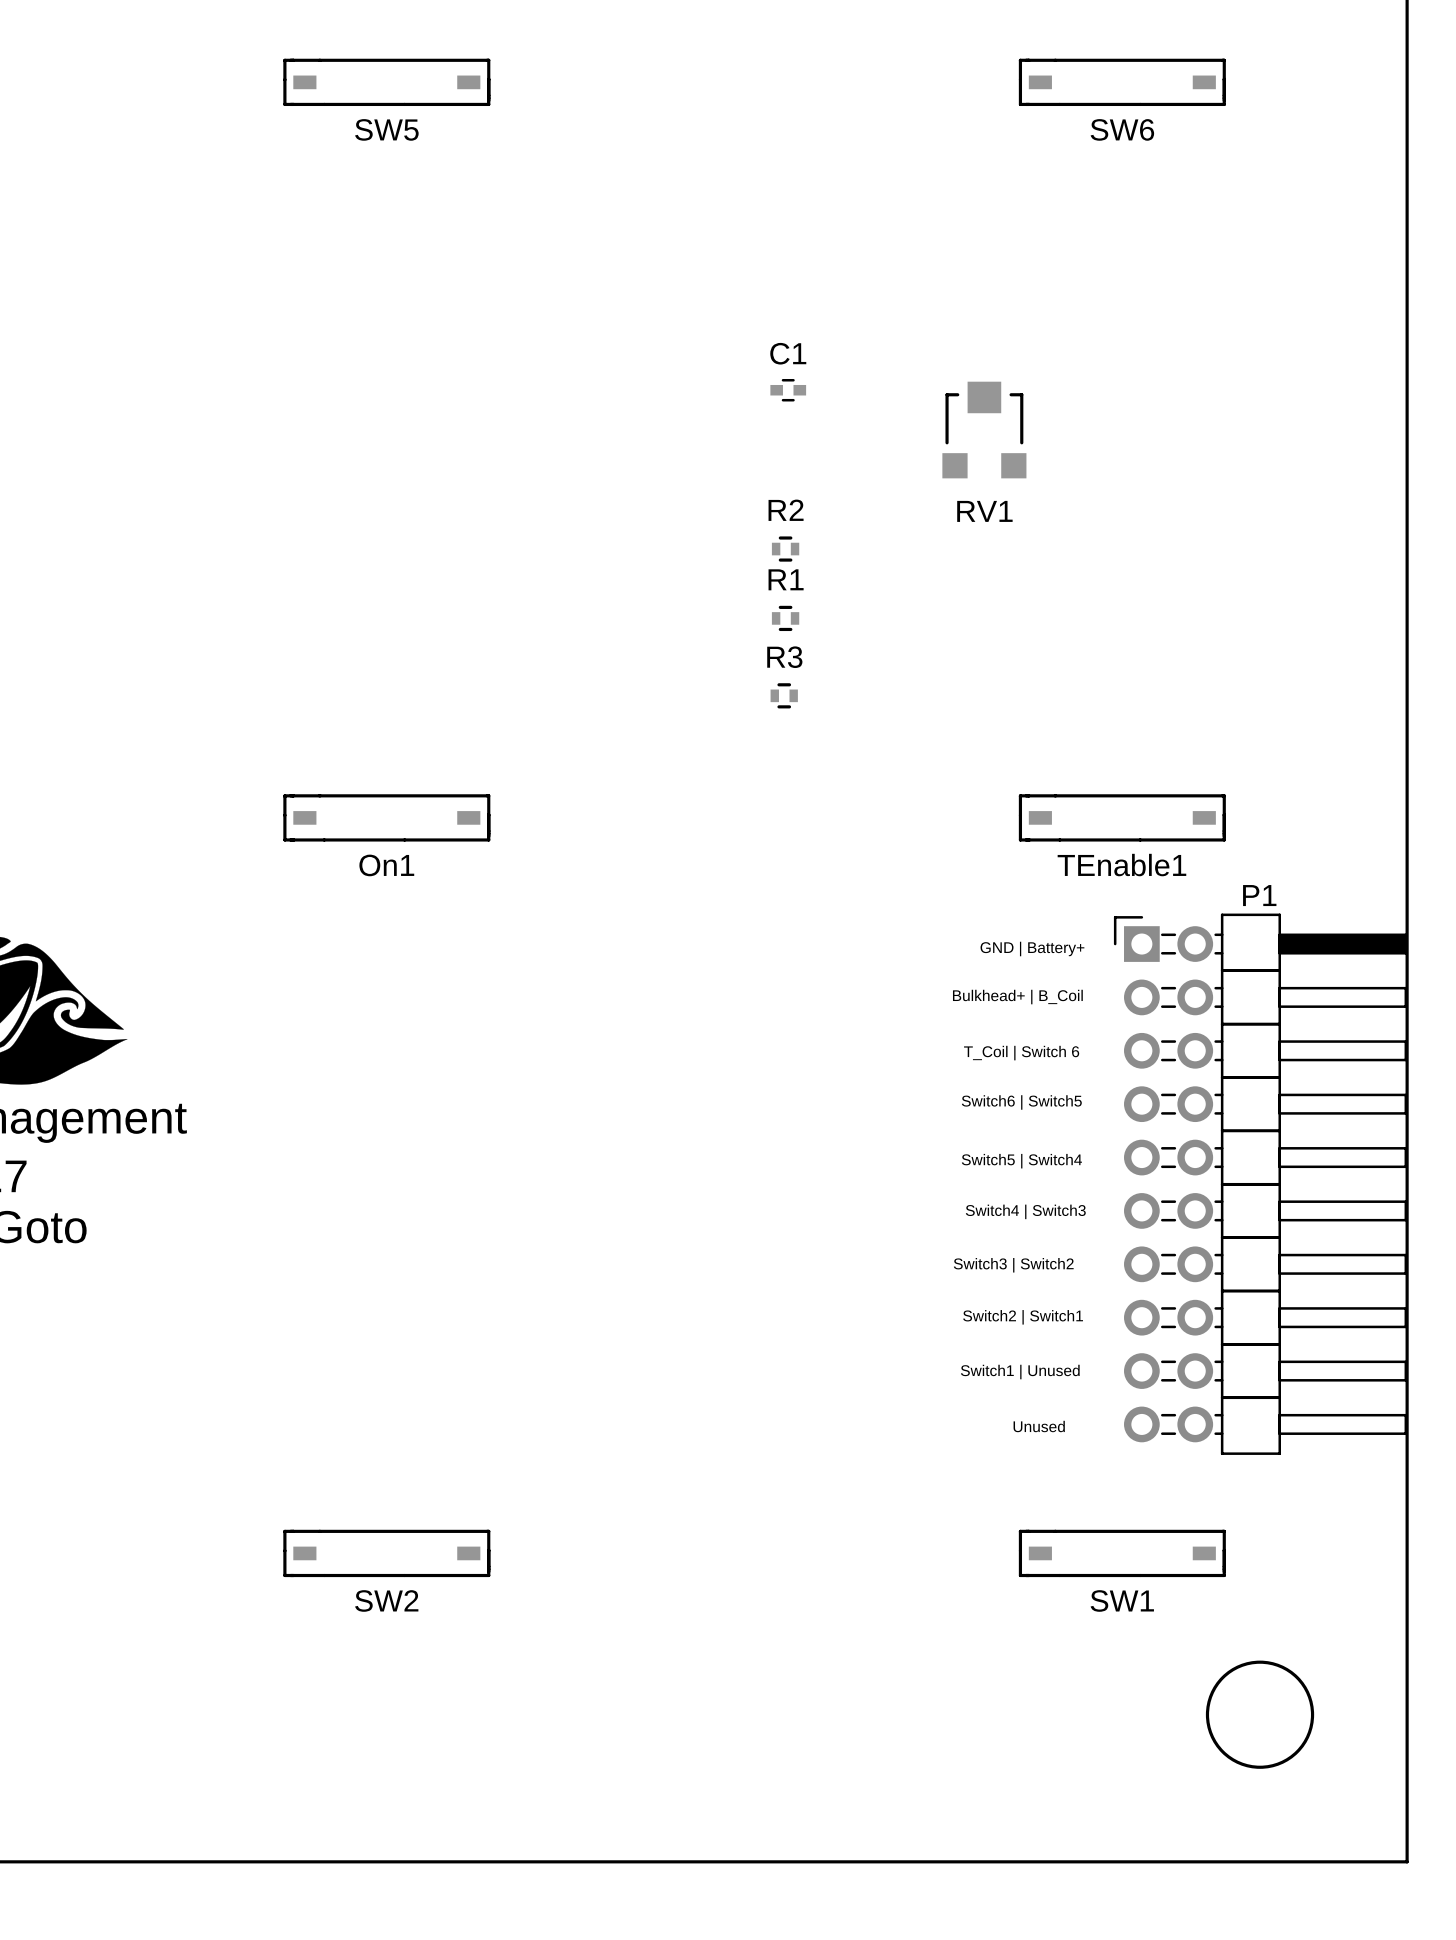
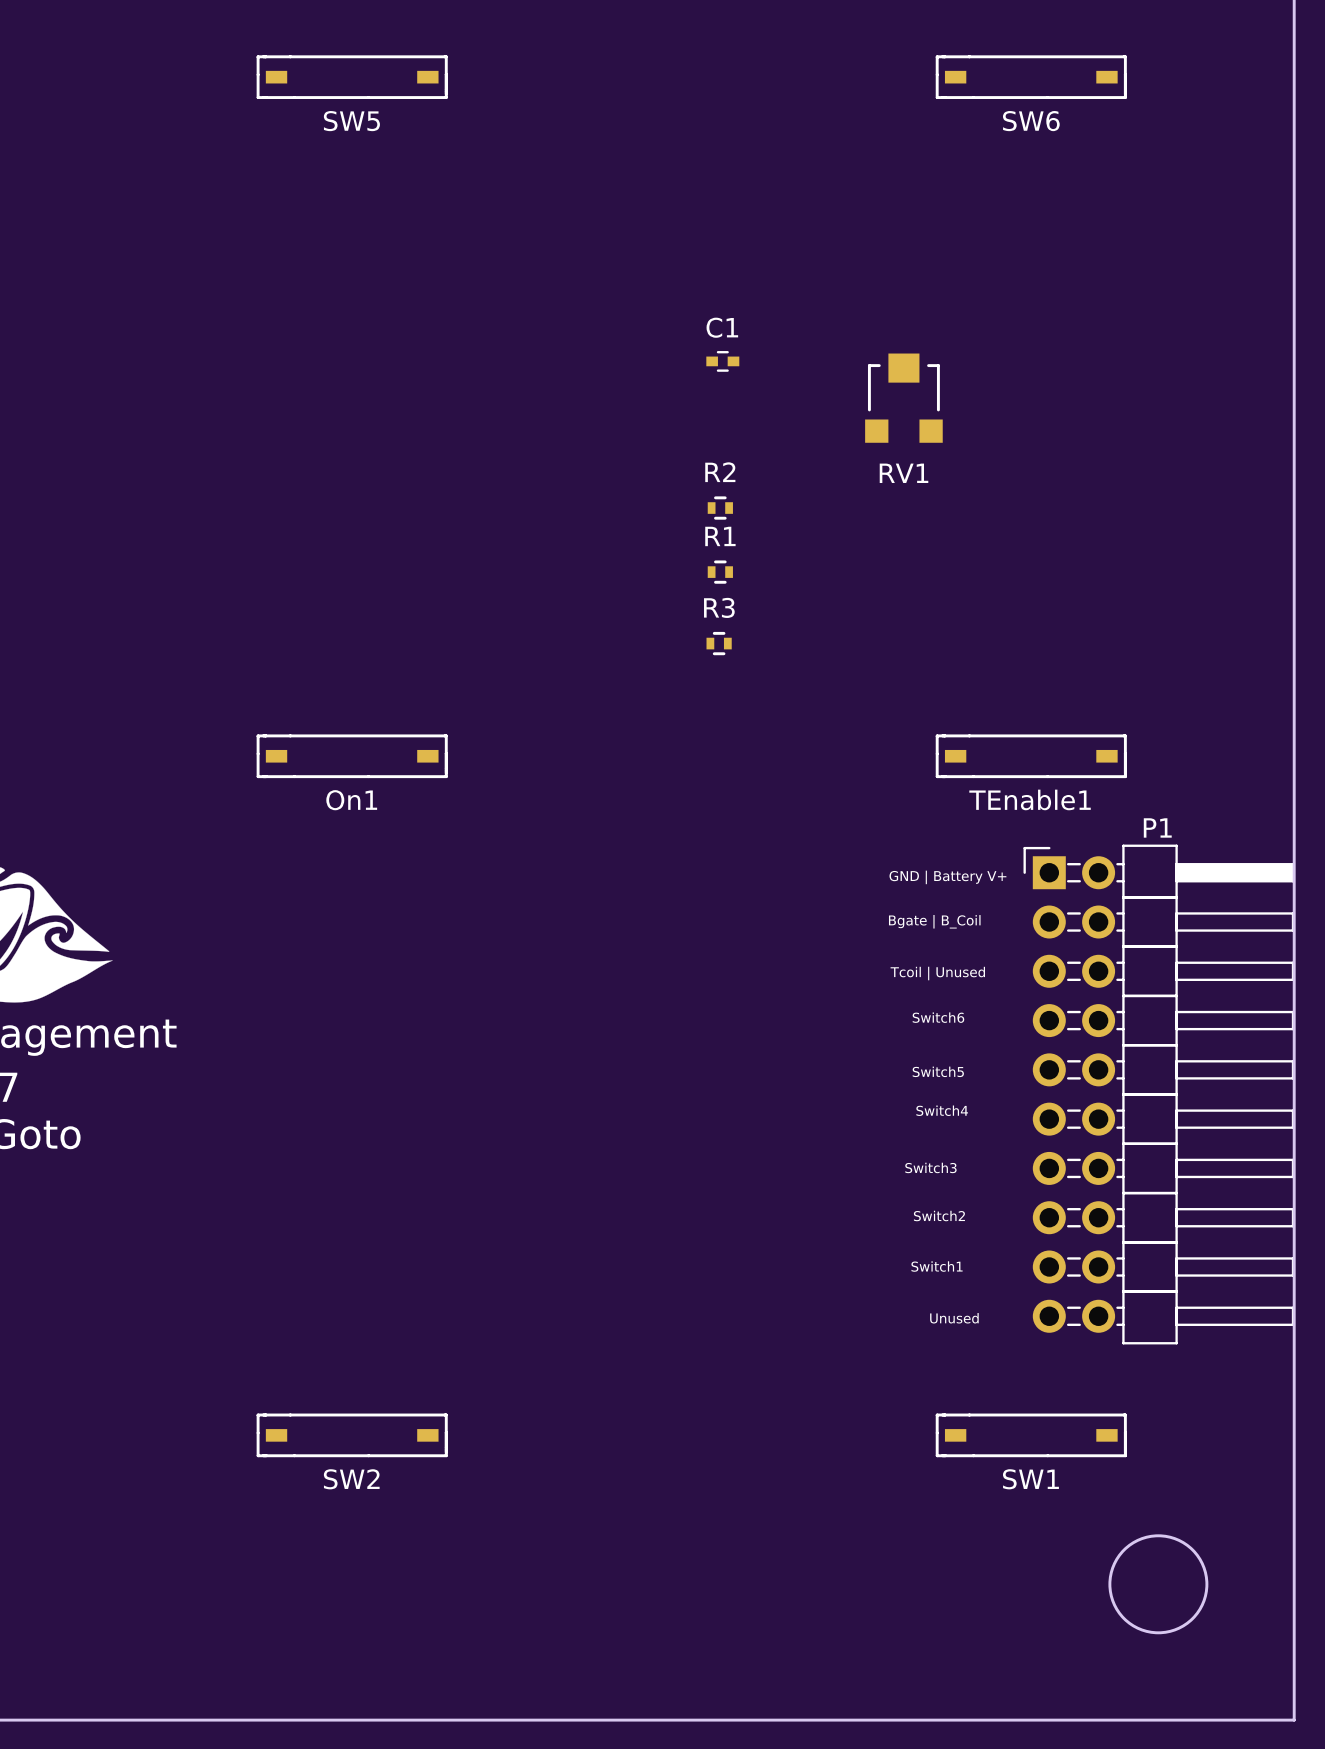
text: GND | Battery+ (1032, 949) -> GND | Battery V+ (947, 877)
text: Bulkhead+ | B_Coil (1017, 997) -> Bgate | B_Coil (934, 921)
text: T_Coil | Switch 6 (1021, 1053) -> Tcoil | Unused (937, 973)
text: Switch6 | Switch5 (1021, 1102) -> Switch6 (938, 1017)
text: Switch5 | Switch4 (1021, 1161) -> Switch5 (938, 1071)
text: Switch4 | Switch3 (1025, 1211) -> Switch4 (942, 1110)
text: Switch3 | Switch2 (1013, 1265) -> Switch3 (930, 1167)
text: Switch2 | Switch1 (1023, 1317) -> Switch2 (939, 1216)
text: Switch1 | Unused (1020, 1372) -> Switch1 (937, 1266)

